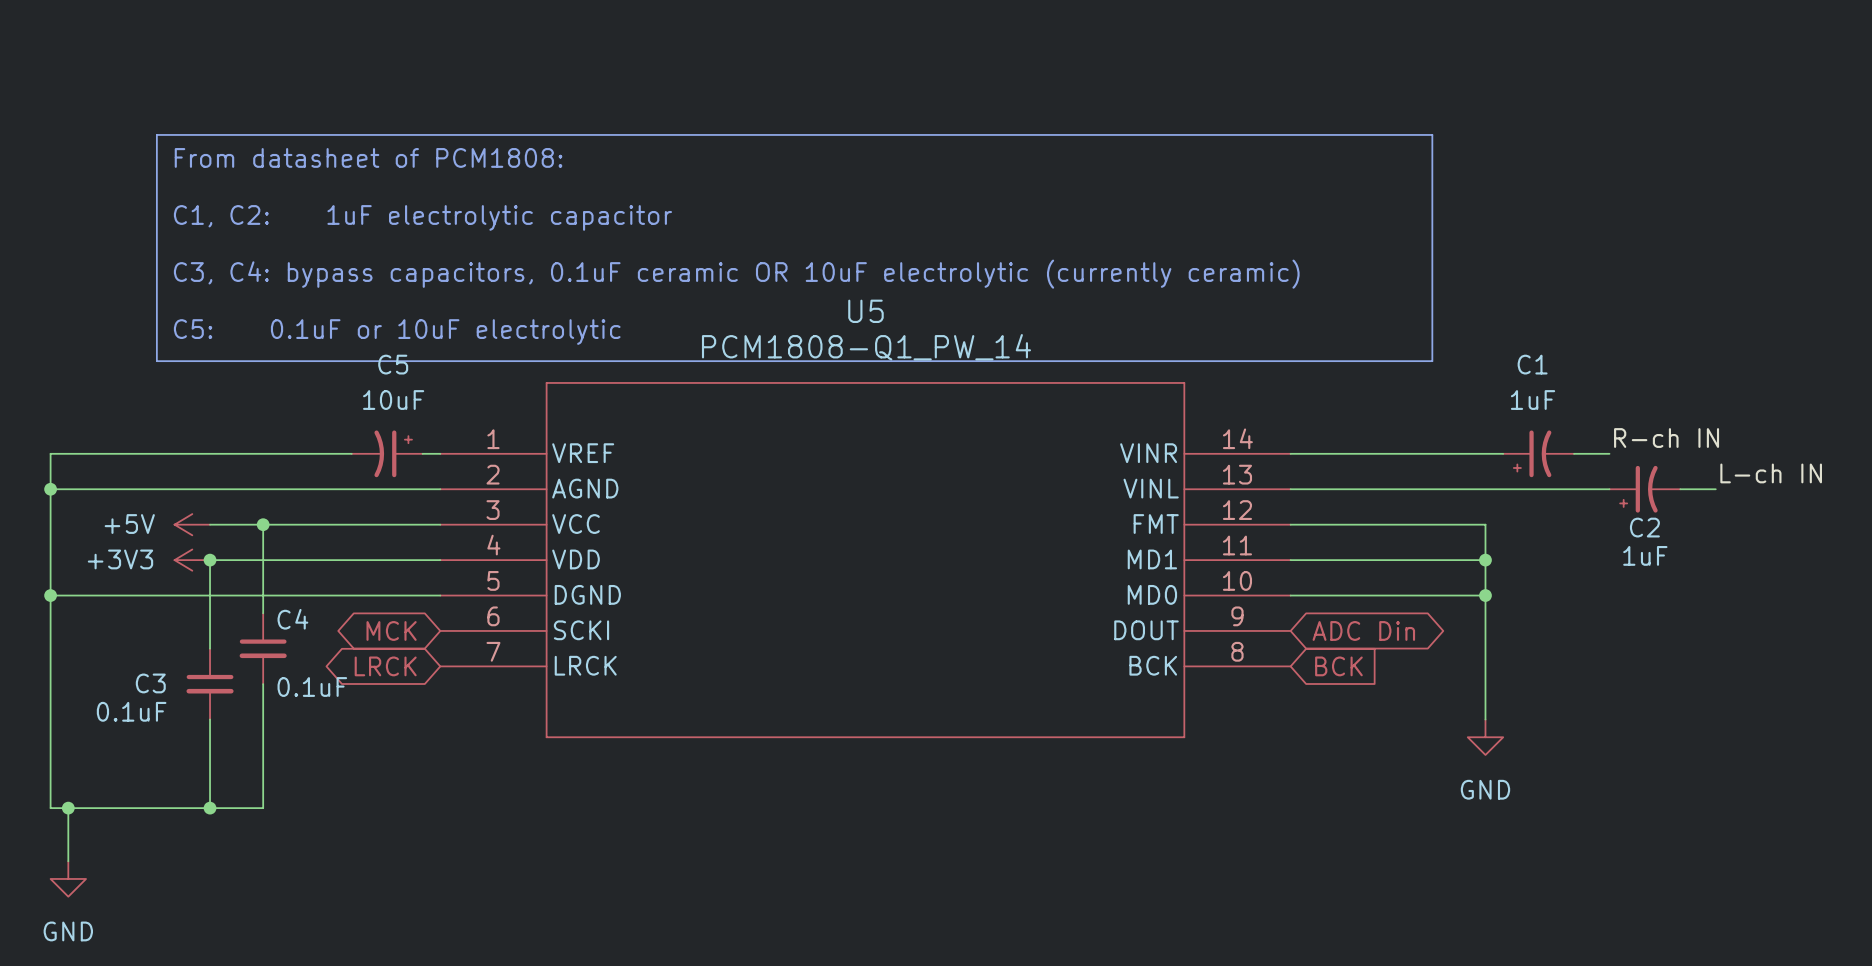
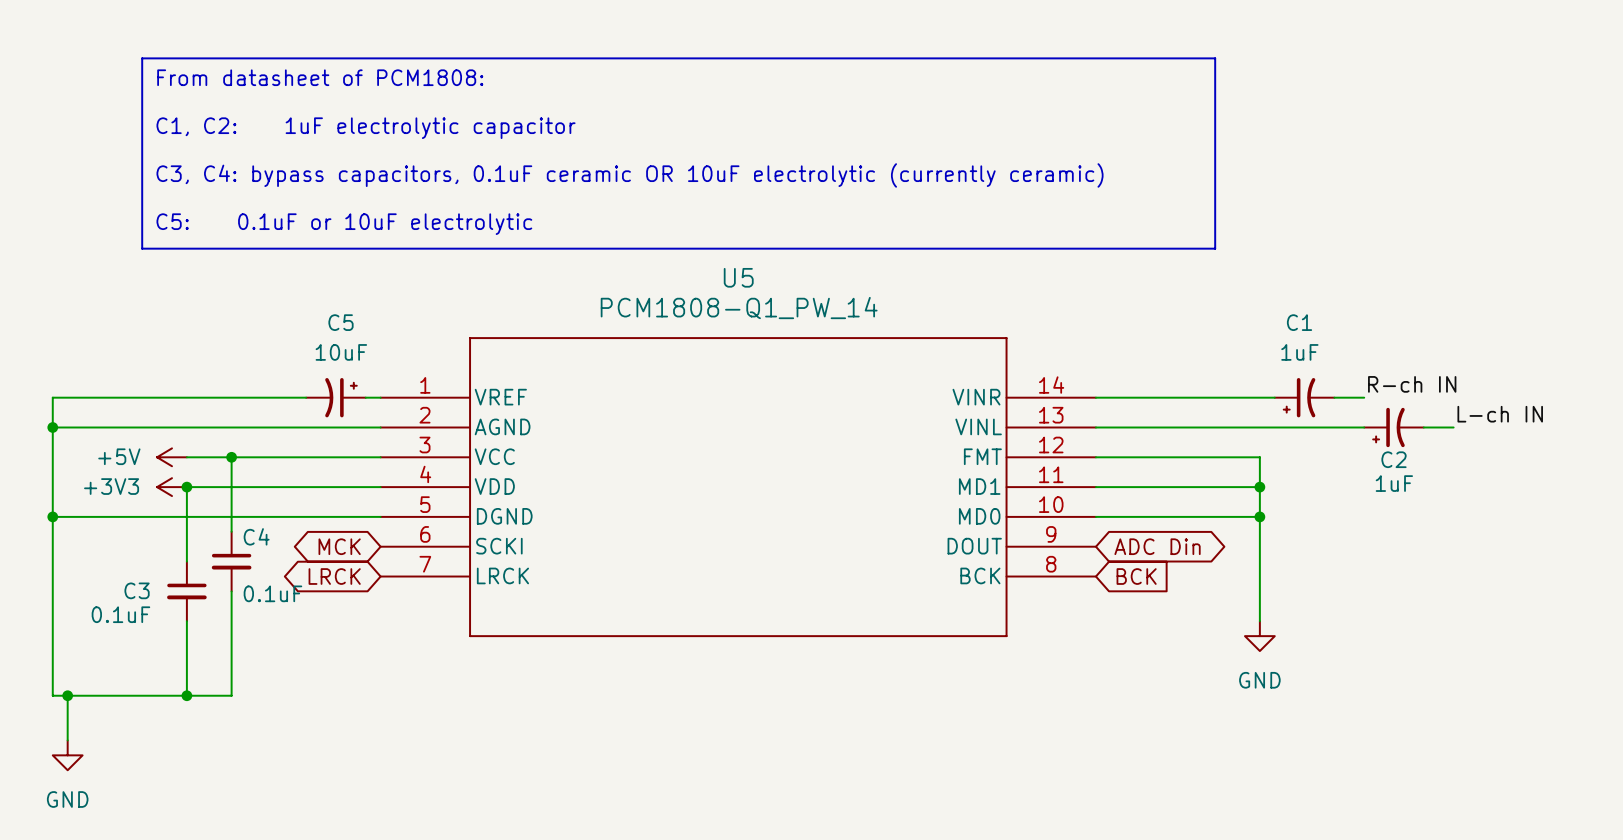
line: (156, 134) (1432, 134) -> (142, 129) (142, 58) (1215, 58) (1215, 129)
text position: From datasheet of PCM1808: (368, 157) -> From datasheet of PCM1808: (320, 77)
text position: C1, C2: 1uF electrolytic capacitor (422, 217) -> C1, C2: 1uF electrolytic capacitor (366, 128)
text position: C3, C4: bypass capacitors, 0.1uF ceramic OR 10uF electrolytic (currently ceramic) (736, 274) -> C3, C4: bypass capacitors, 0.1uF ceramic OR 10uF electrolytic (currently ceramic) (630, 175)
line: (156, 276) (156, 361) (1432, 361) (1432, 276) -> (142, 248) (1215, 248)
text position: C5: 0.1uF or 10uF electrolytic (397, 332) -> C5: 0.1uF or 10uF electrolytic (344, 224)

